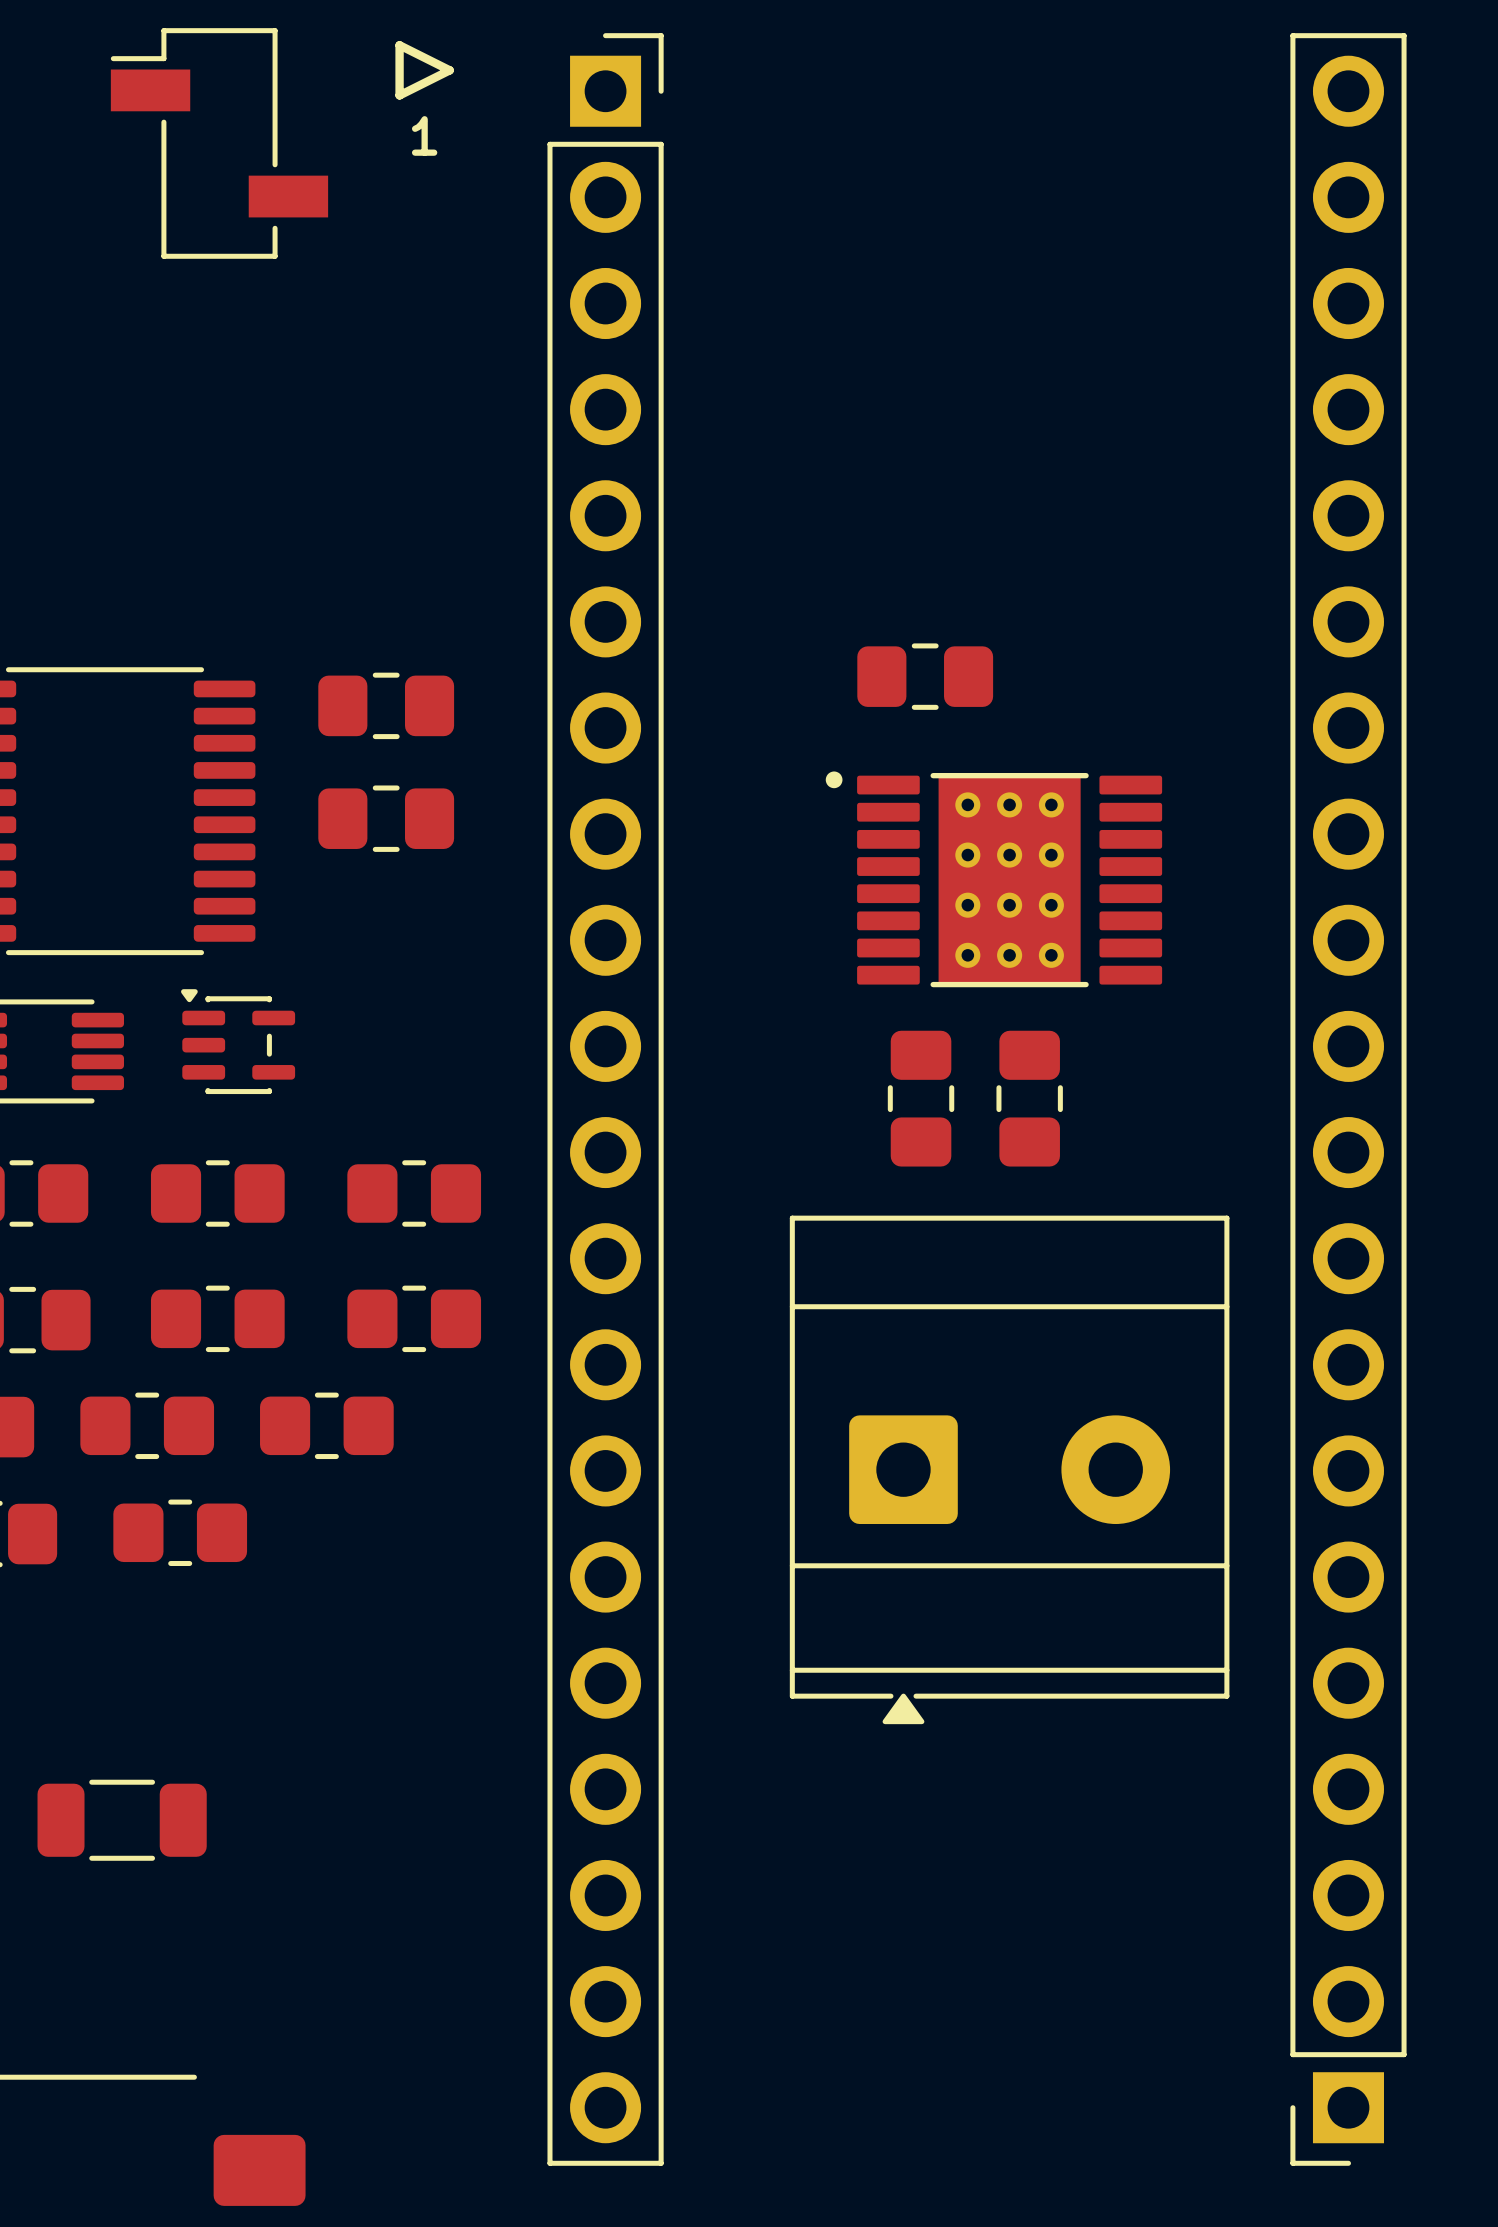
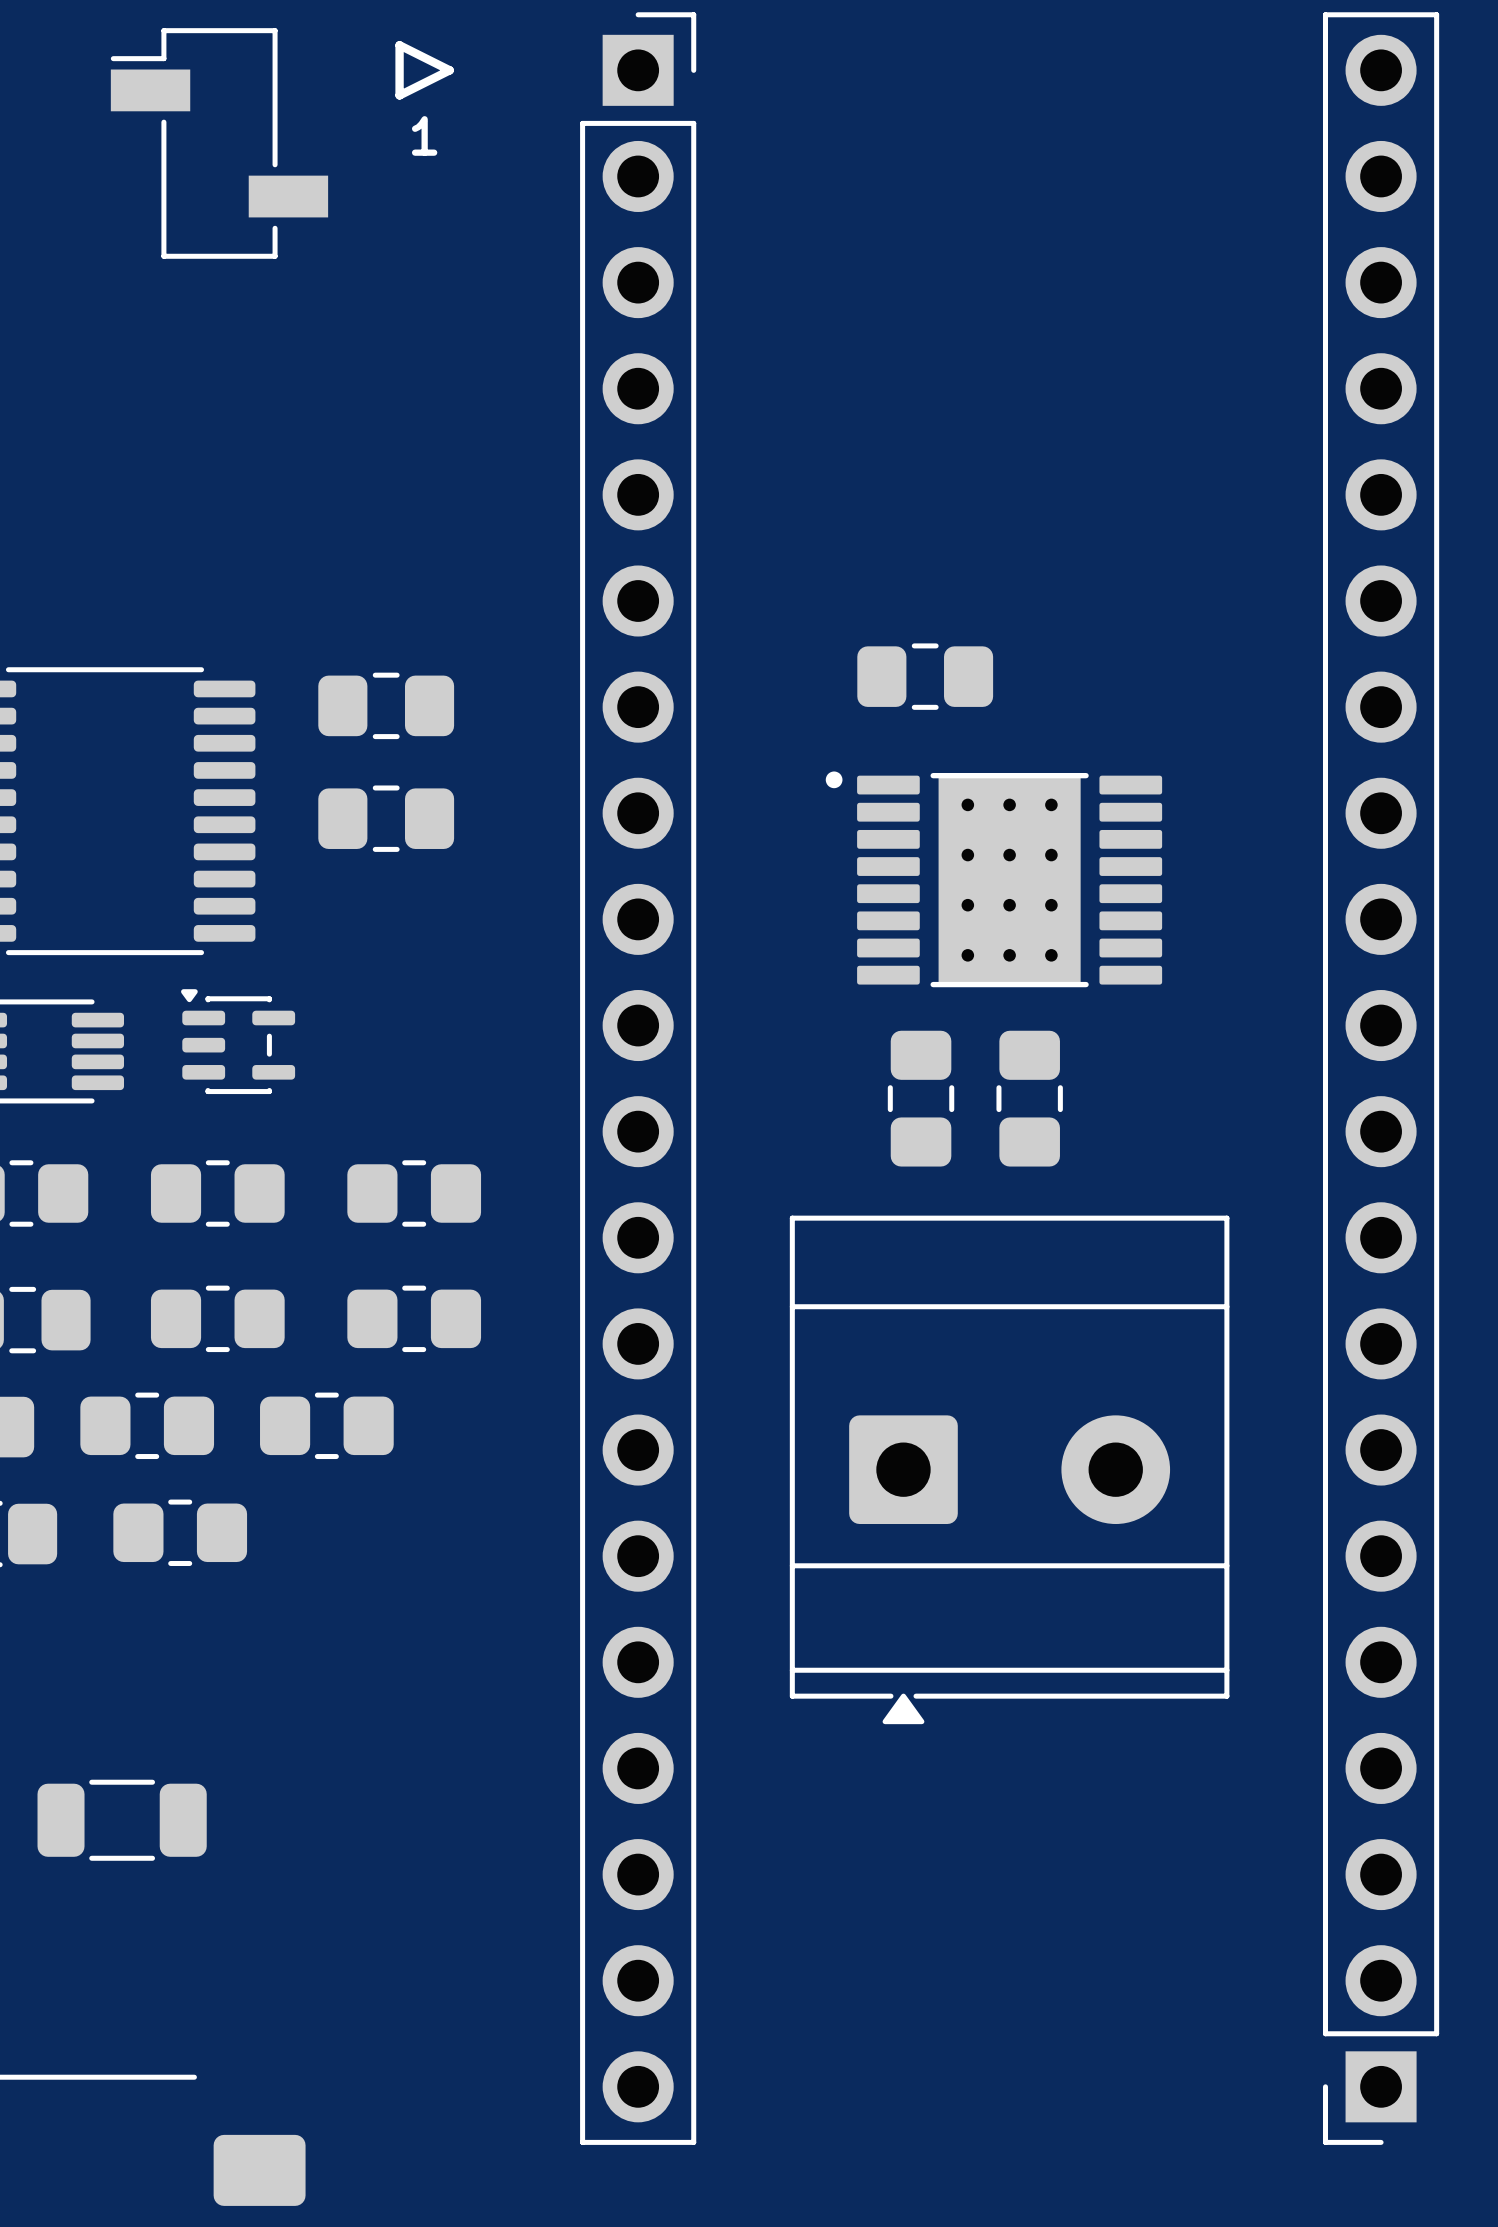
part position: (605, 1099) -> (638, 1078)
part position: (1348, 1099) -> (1381, 1078)

